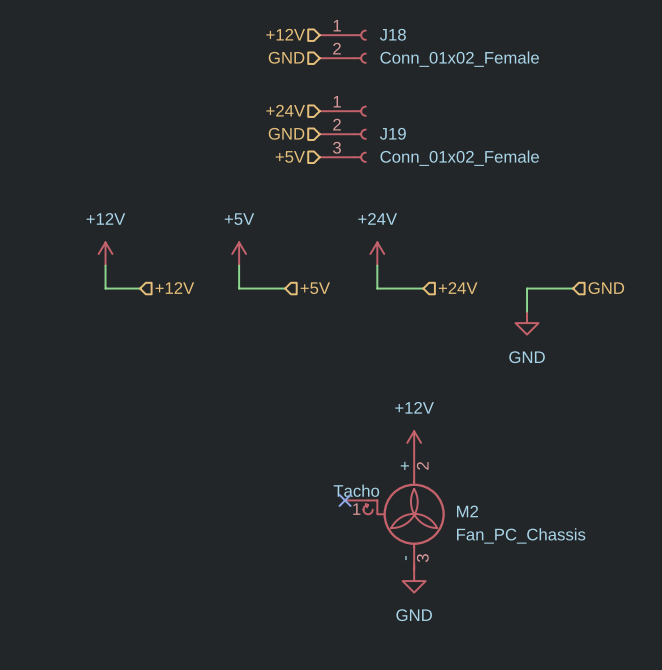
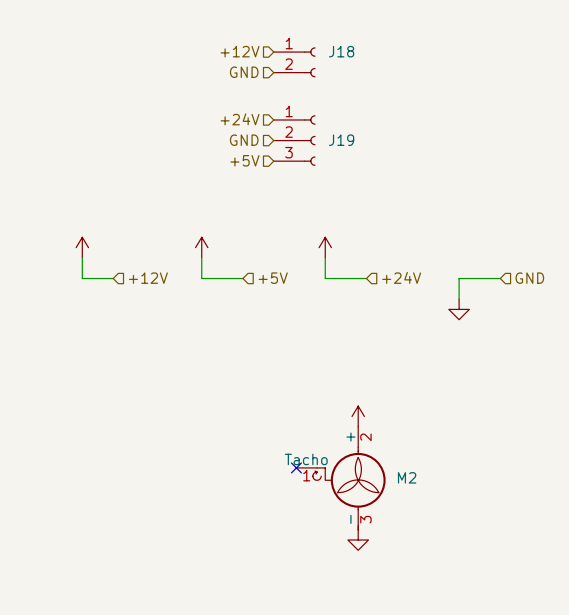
J18 value: Conn_01x02_Female (459, 59) -> none
J19 value: Conn_01x02_Female (459, 158) -> none
power symbol text: +12V (105, 218) -> none
power symbol text: +24V (377, 218) -> none
power symbol text: +5V (239, 219) -> none
power symbol text: GND (527, 357) -> none
power symbol text: +12V (414, 407) -> none
M2 value: Fan_PC_Chassis (521, 535) -> none
power symbol text: GND (414, 615) -> none

